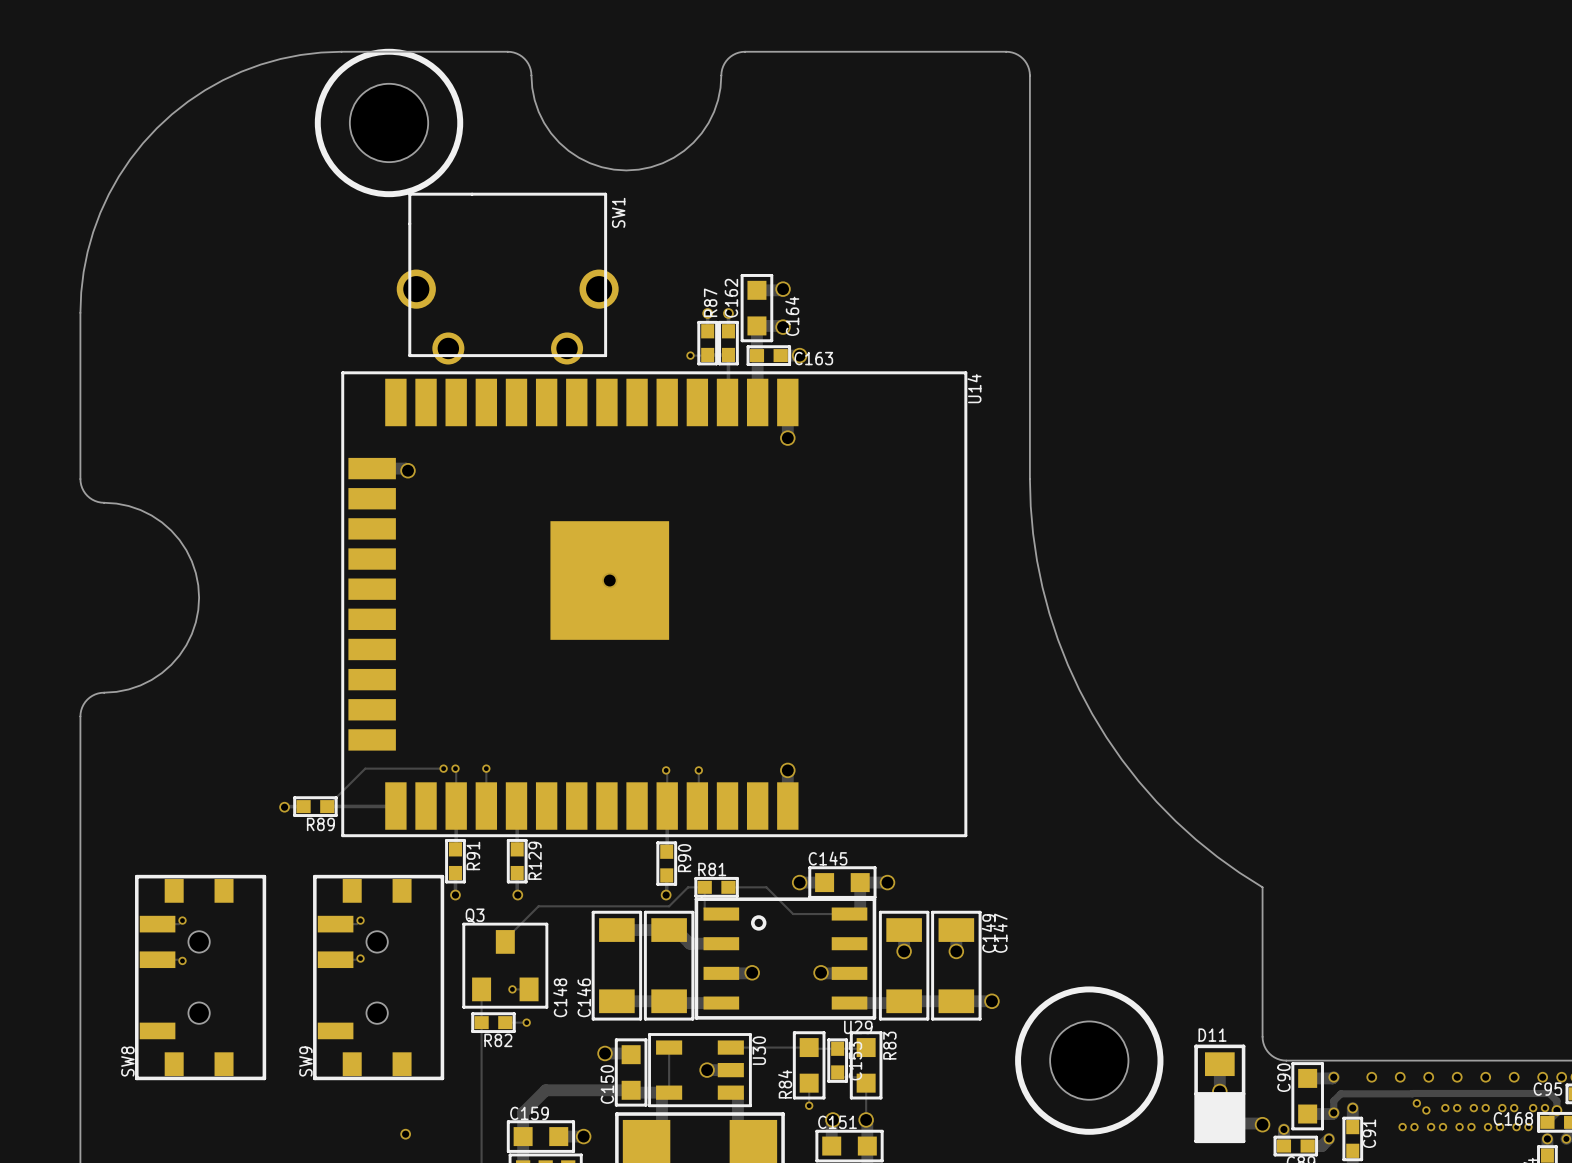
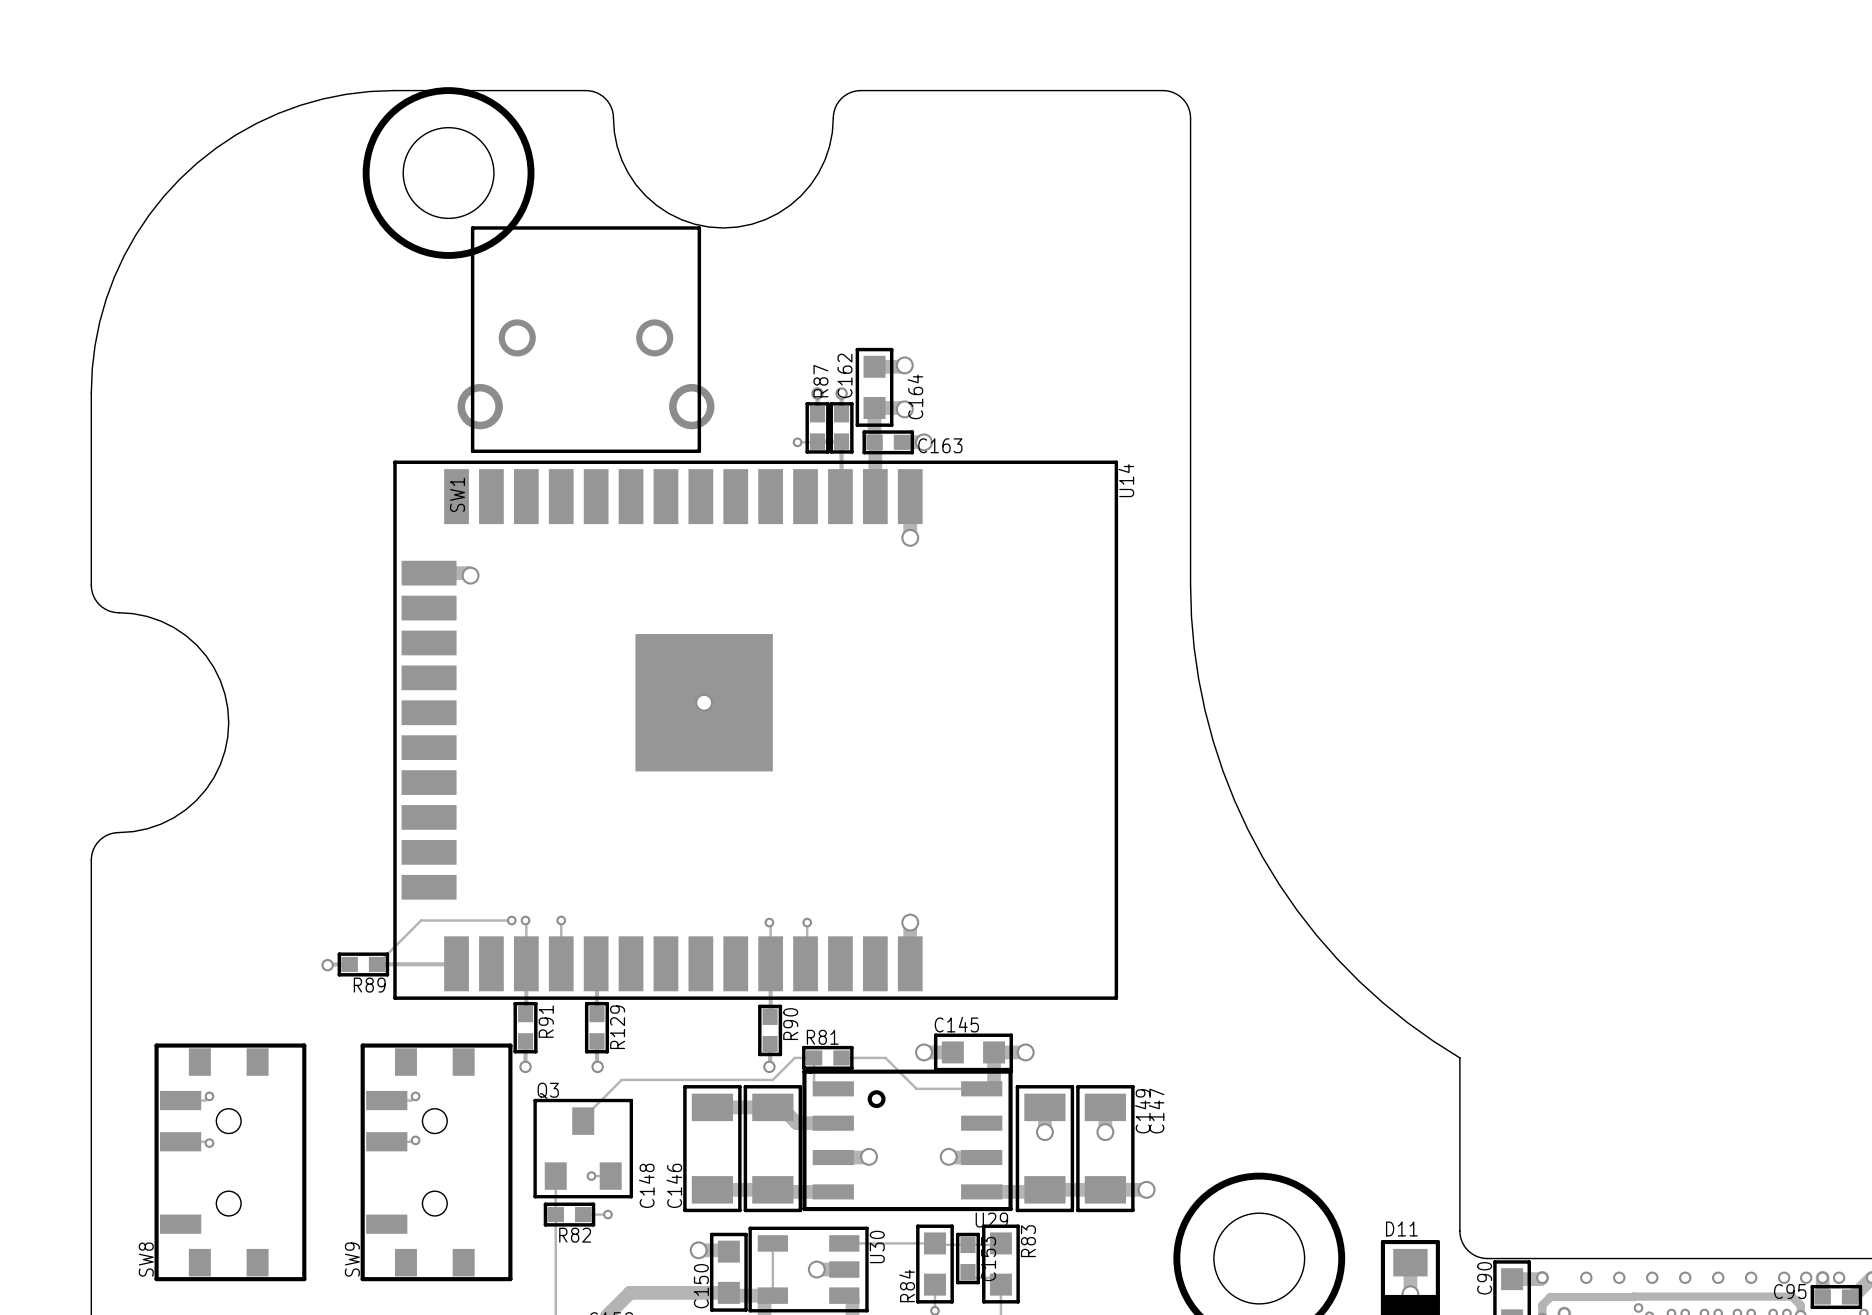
SW1 footprint: [396, 192, 619, 365] -> [457, 226, 715, 453]
SW1 name position: SW1 (618, 212) -> SW1 (457, 494)

